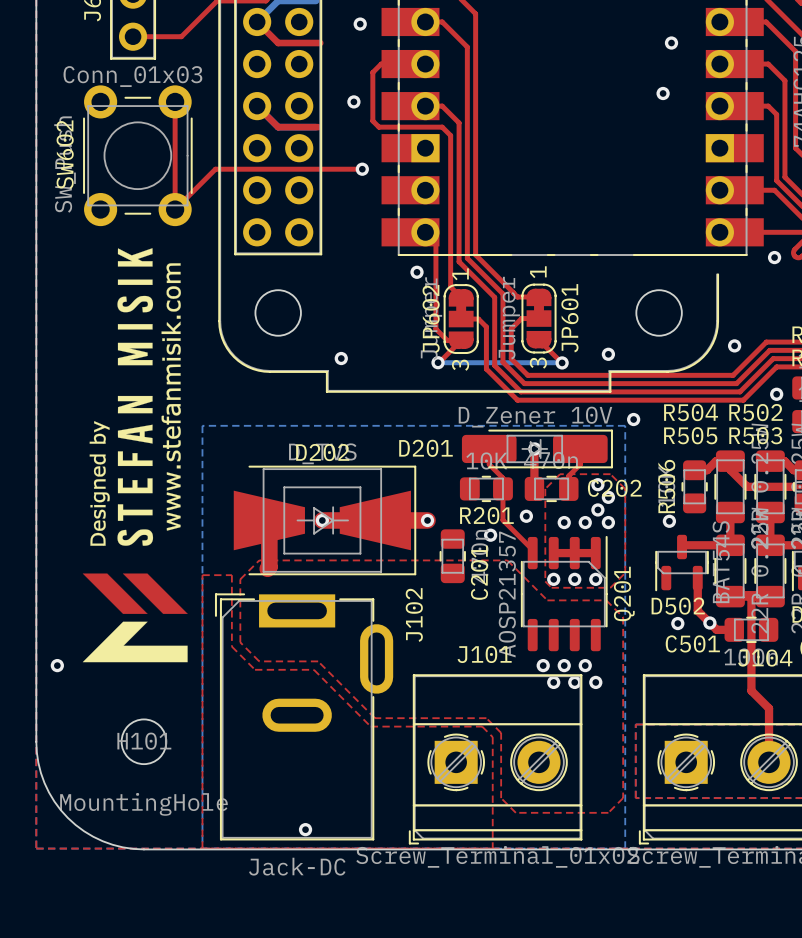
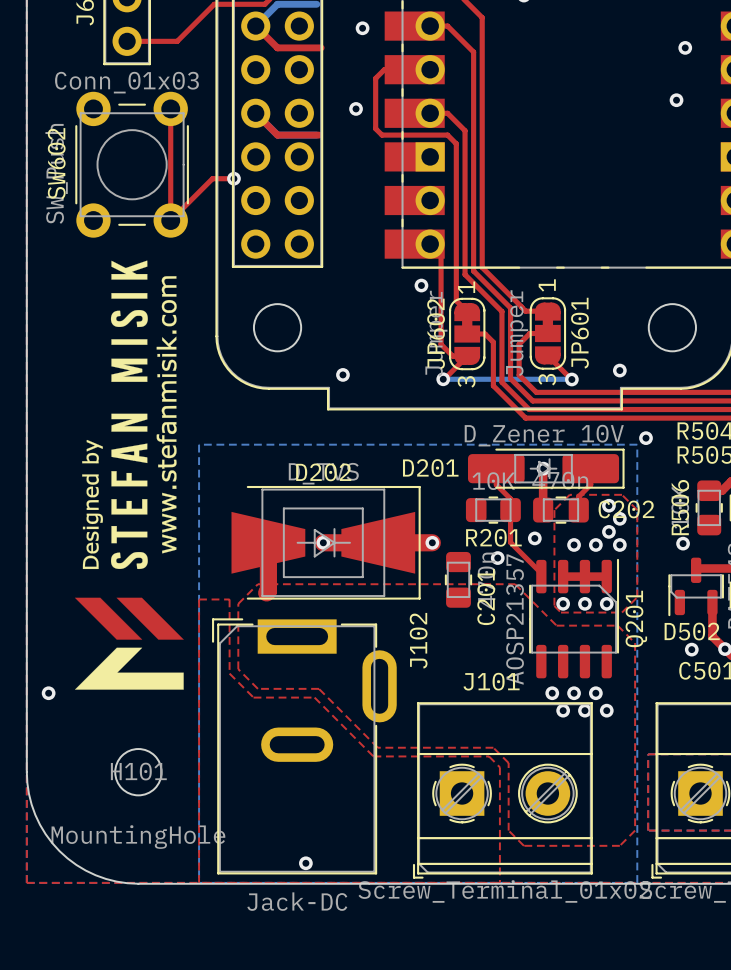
top track: (236, 169) (362, 169) -> none
via: none -> (233, 178)
via: (362, 169) -> none

